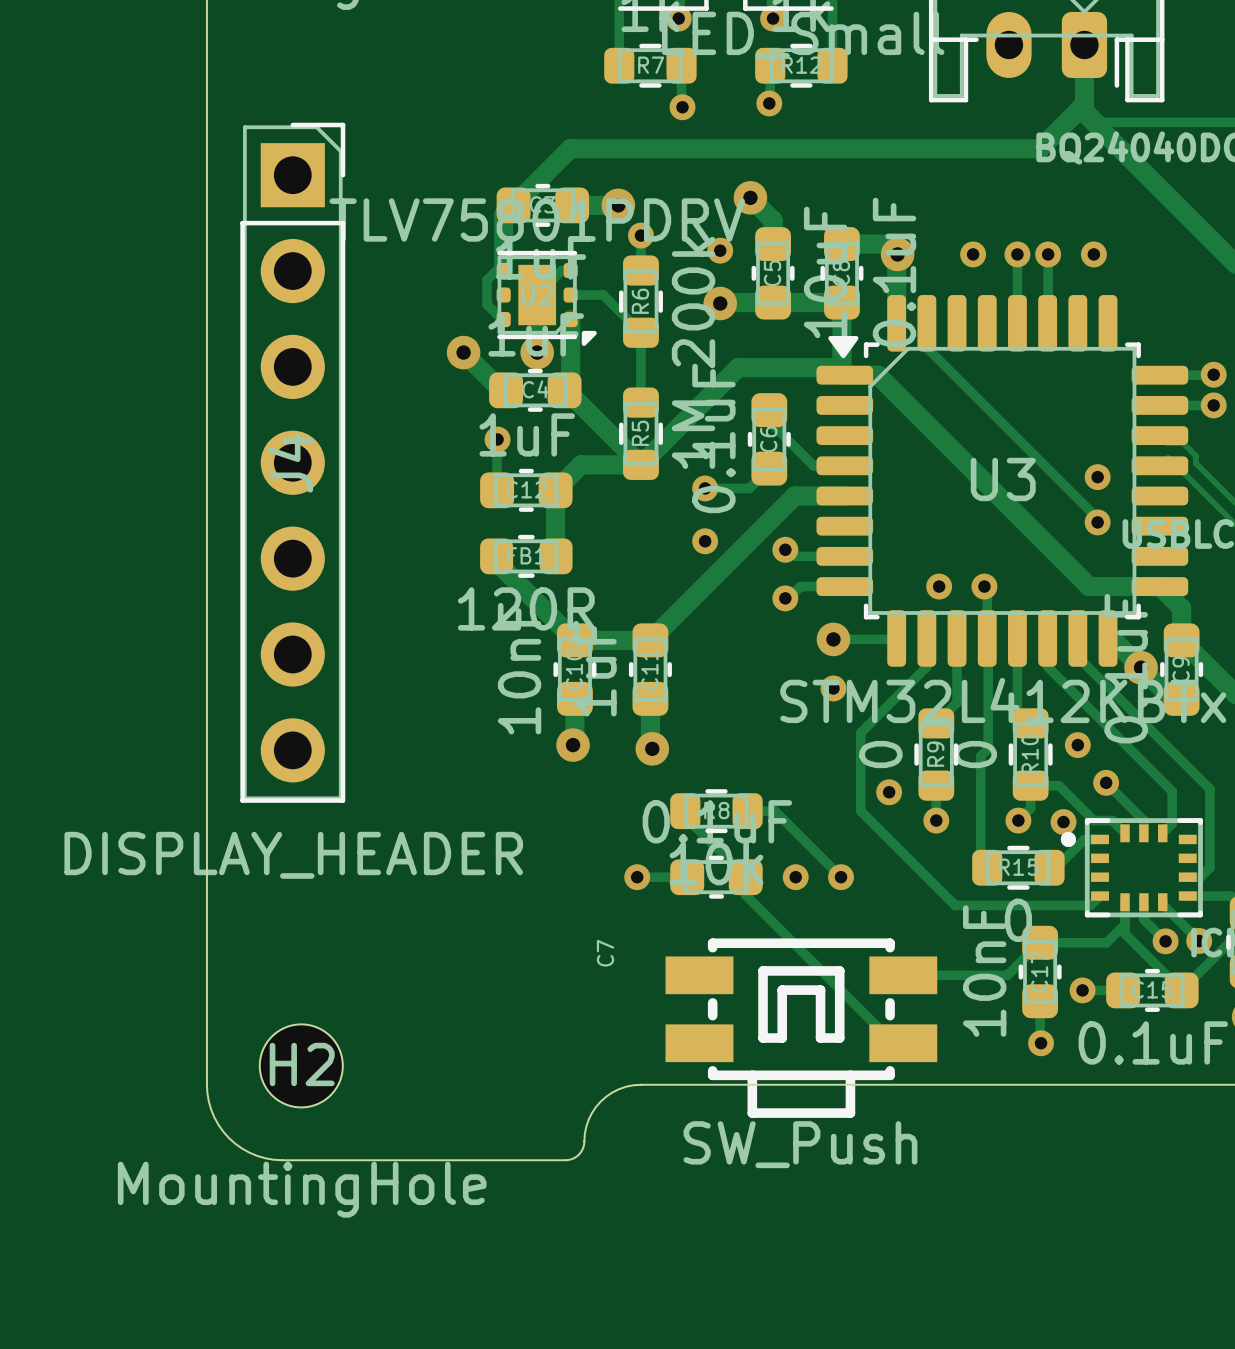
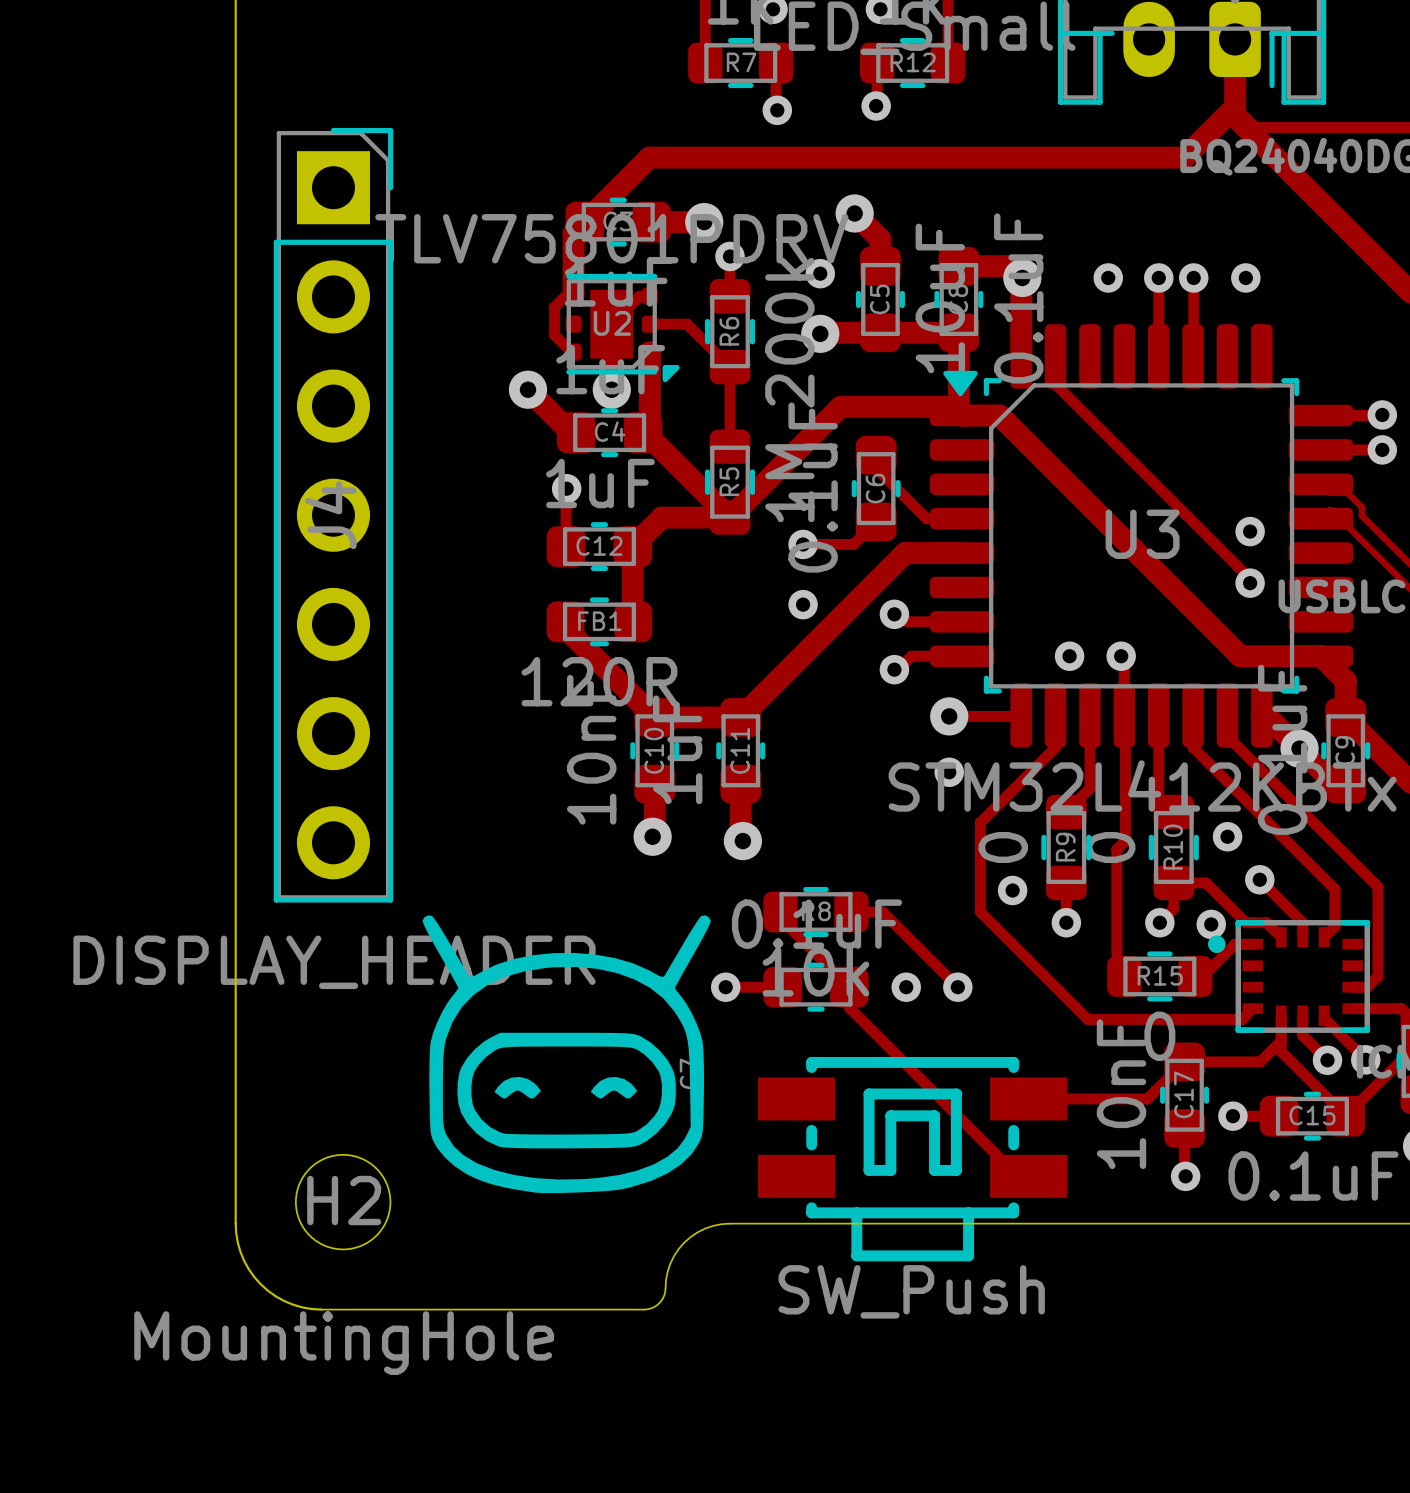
drawing: none -> [422, 915, 711, 1194]

